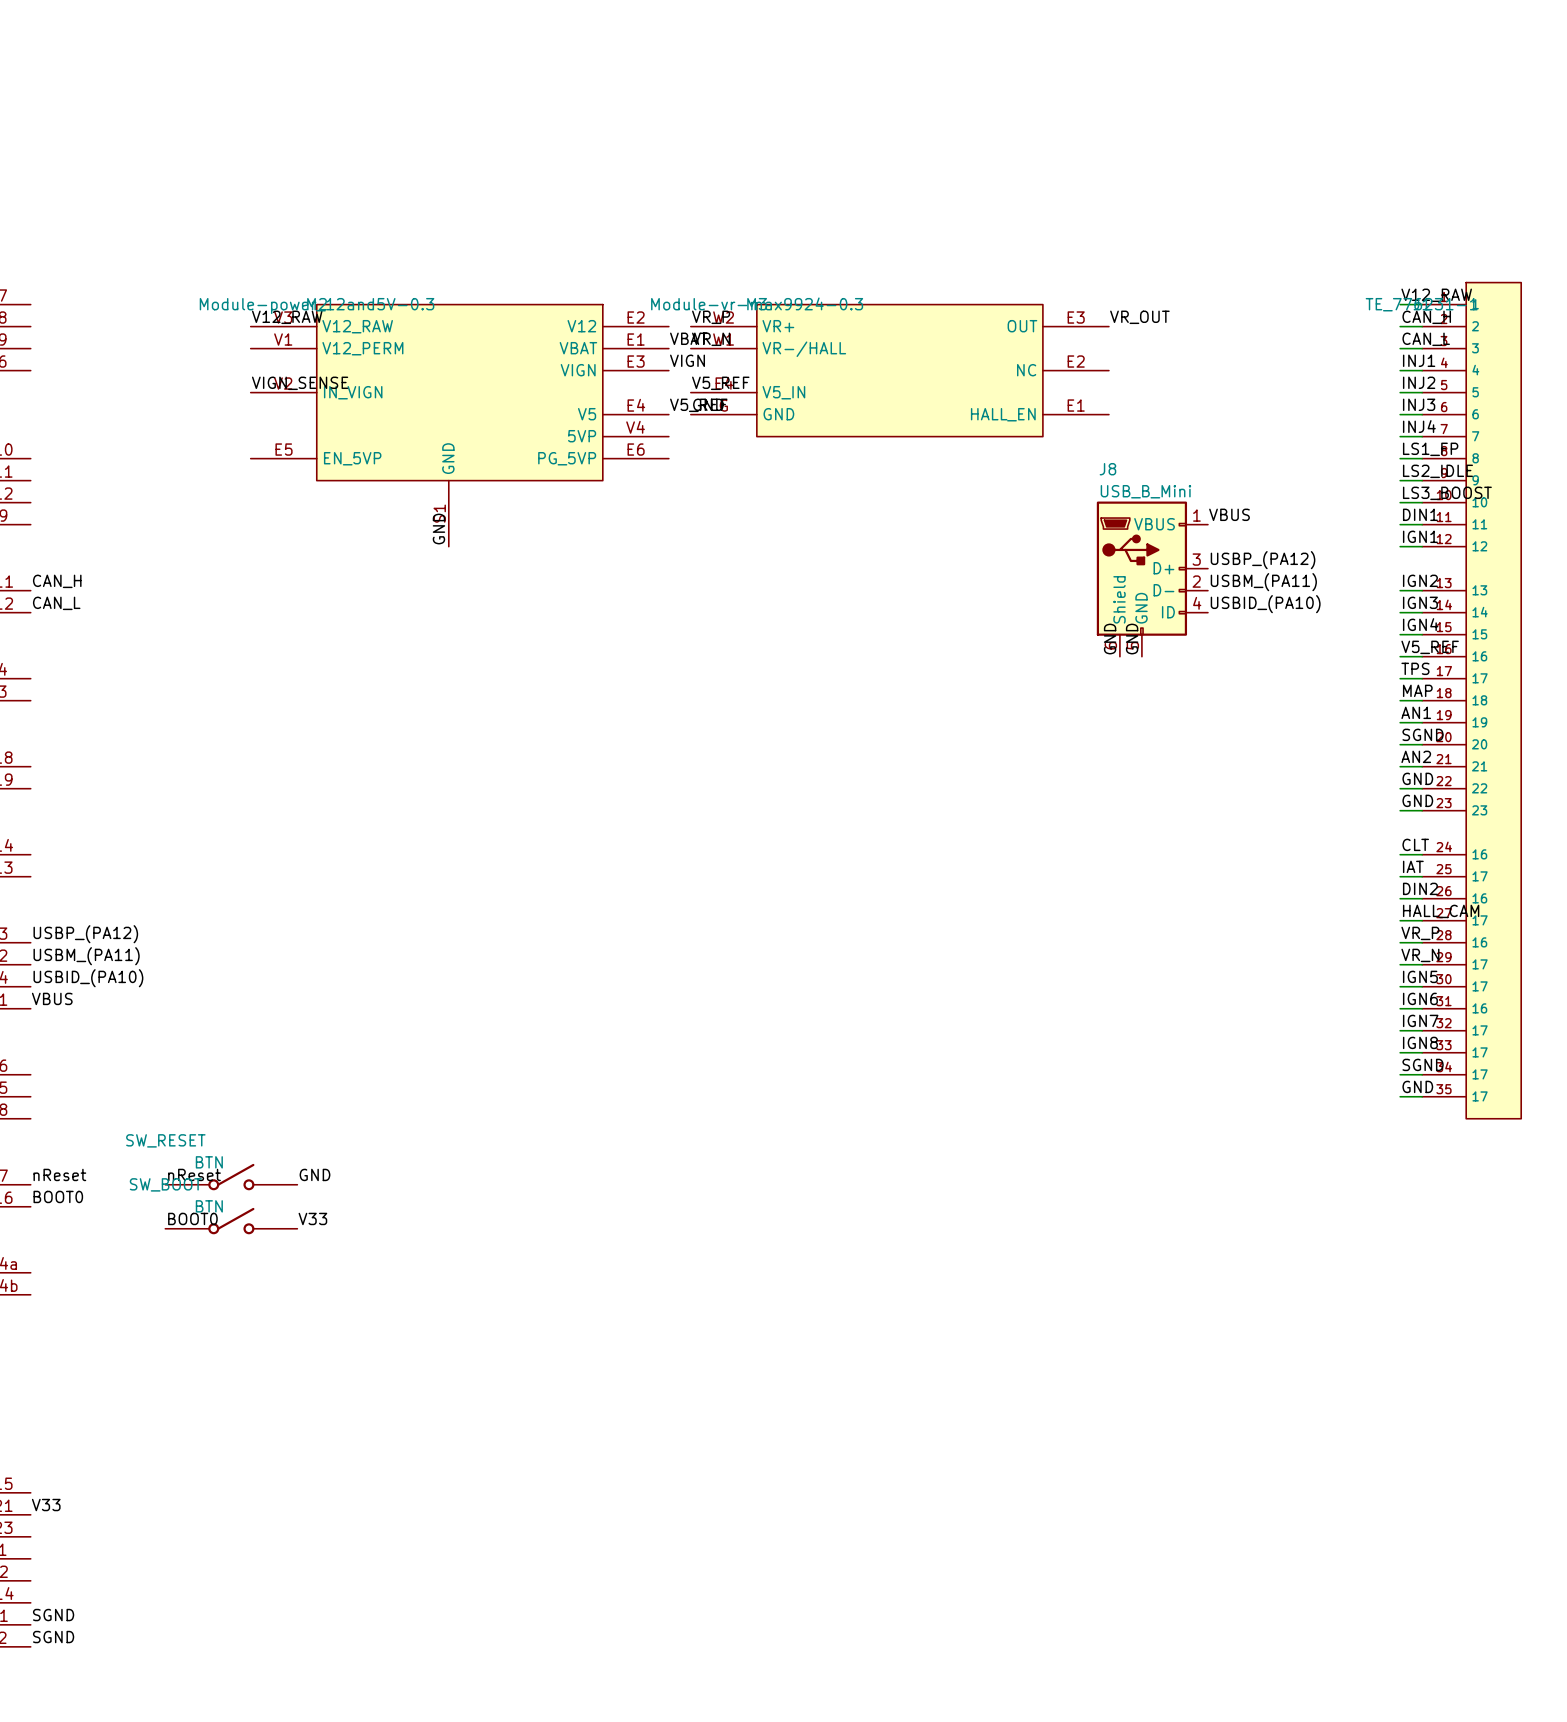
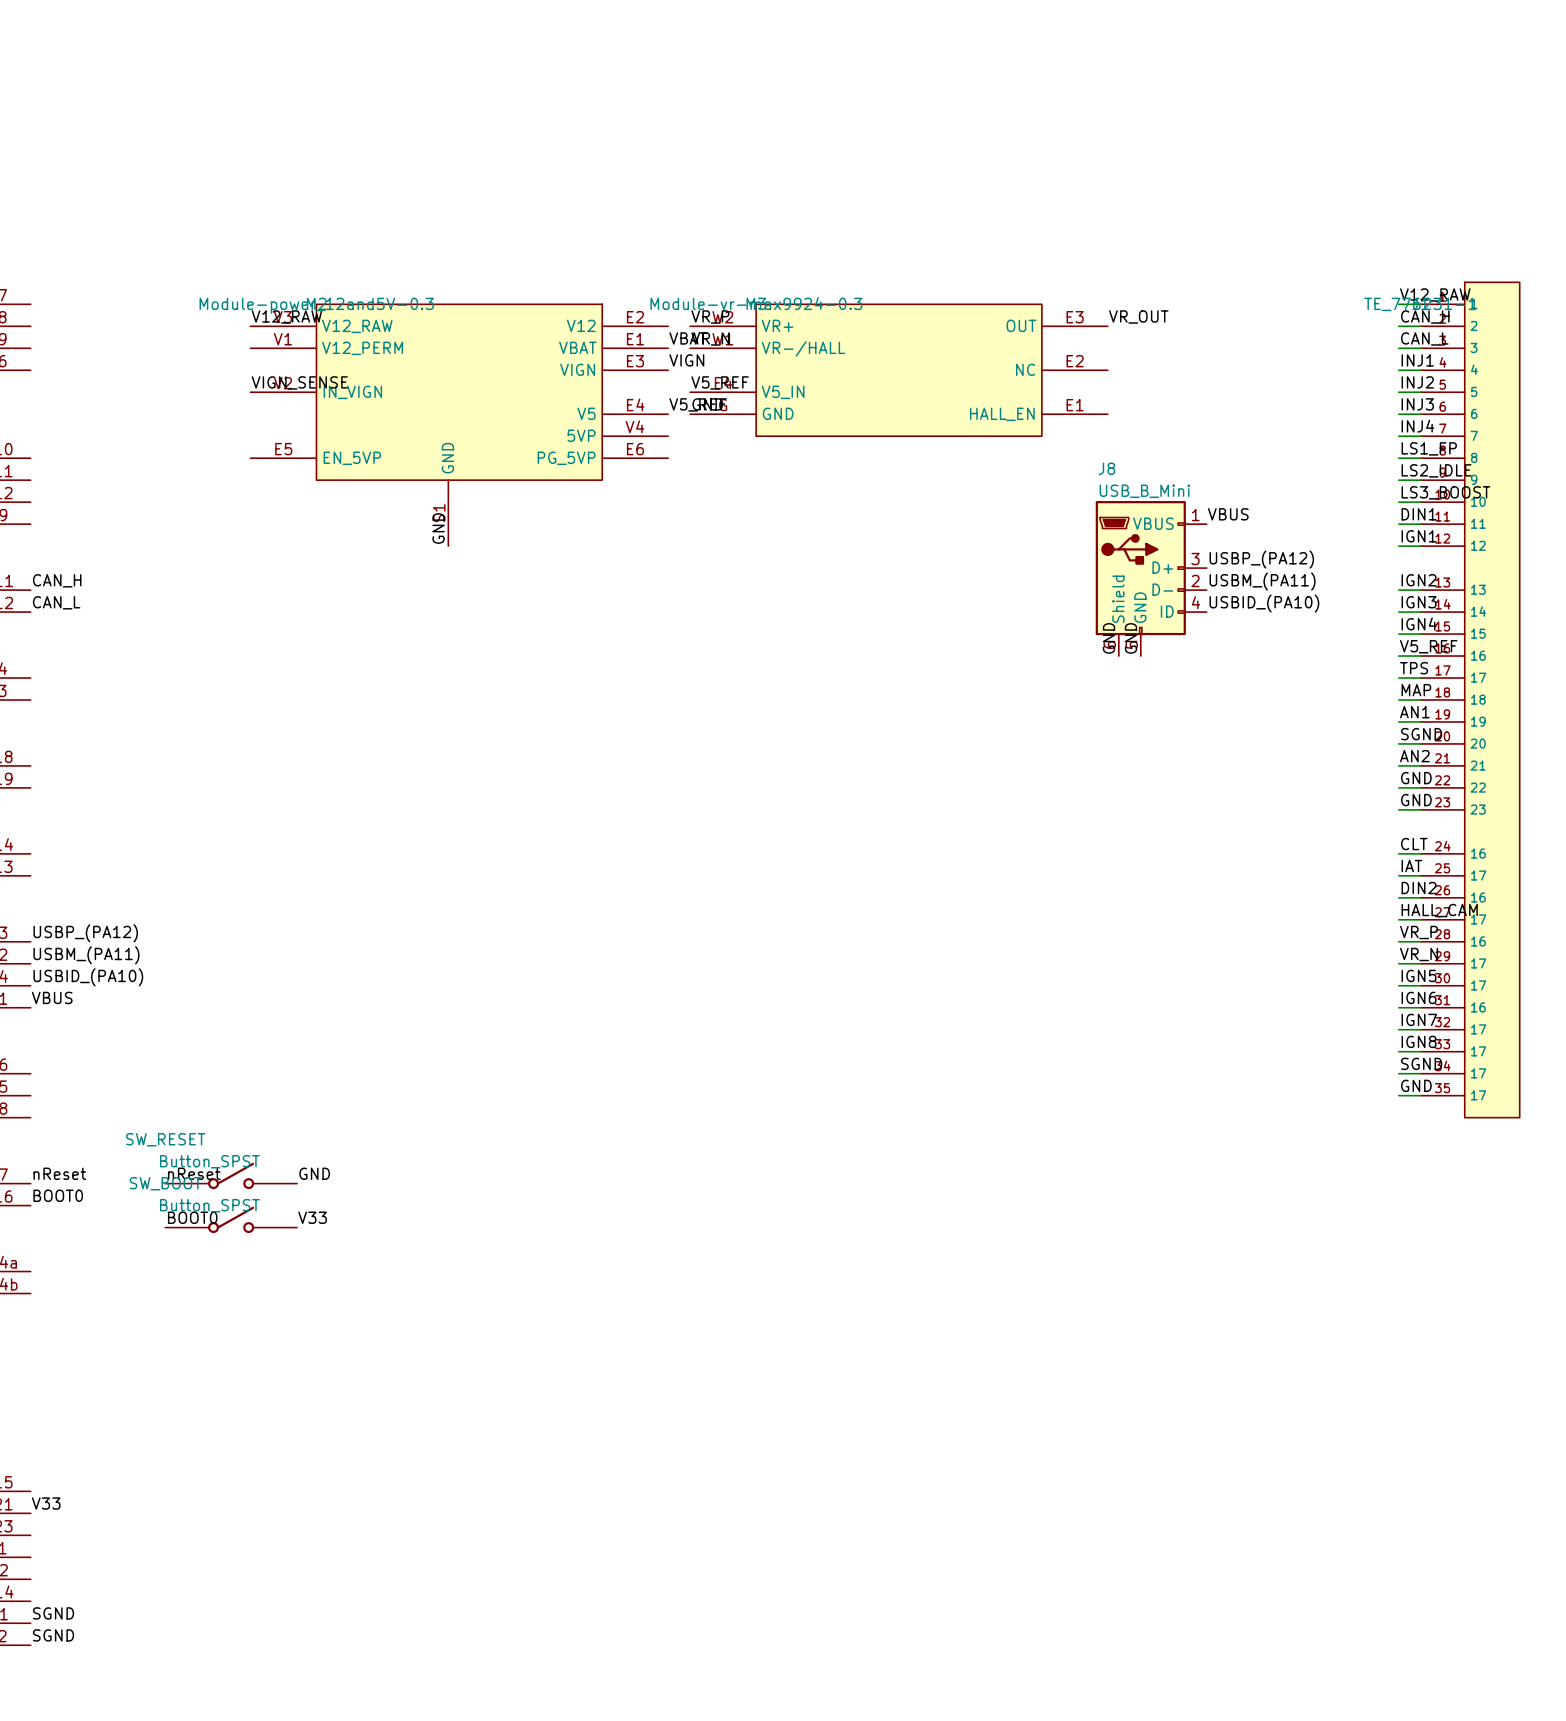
SW_RESET value: BTN (209, 1162) -> Button_SPST (209, 1161)
SW_BOOT value: BTN (209, 1206) -> Button_SPST (209, 1205)

